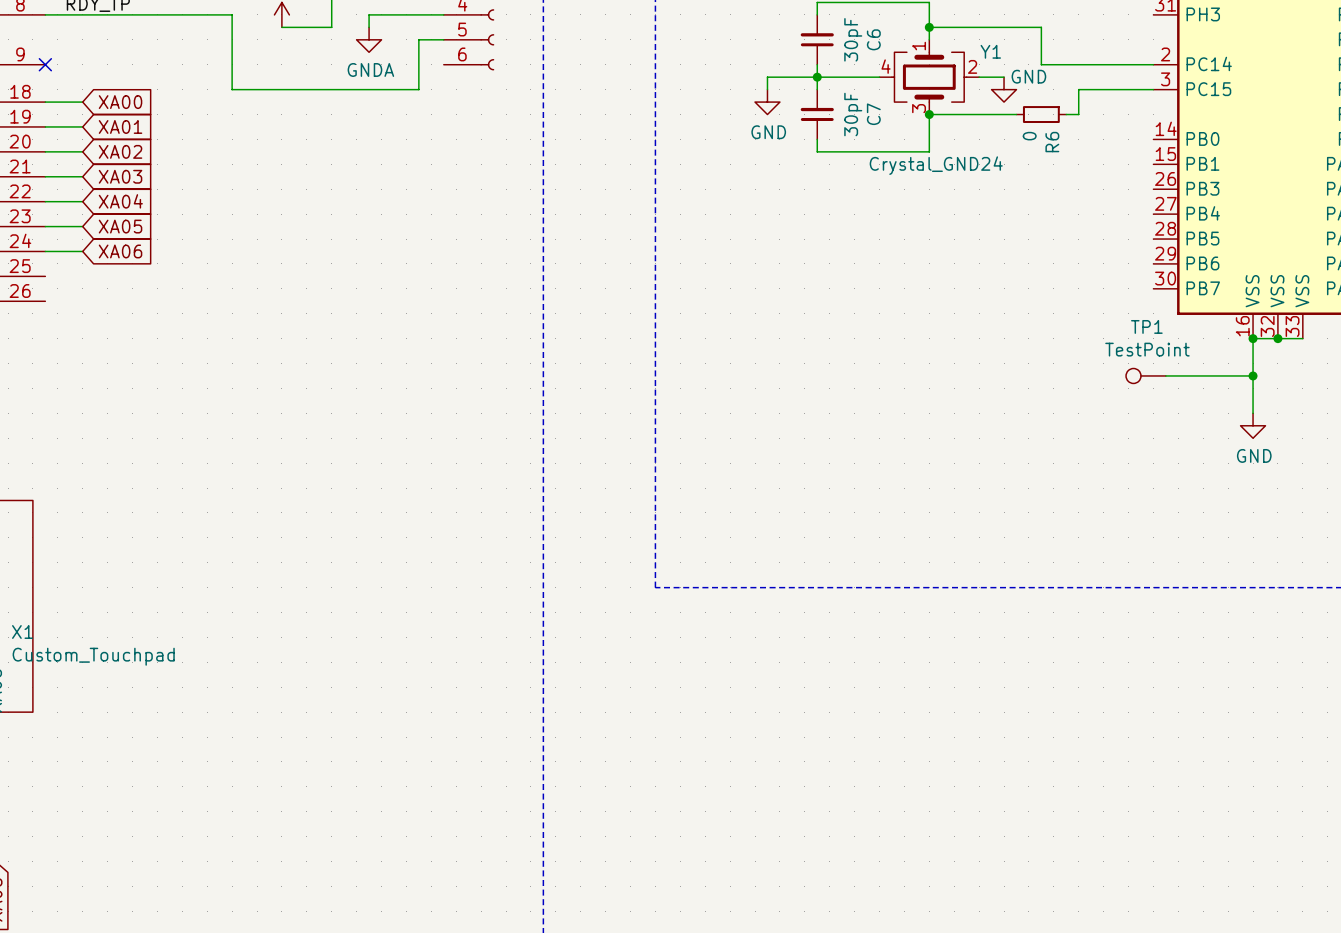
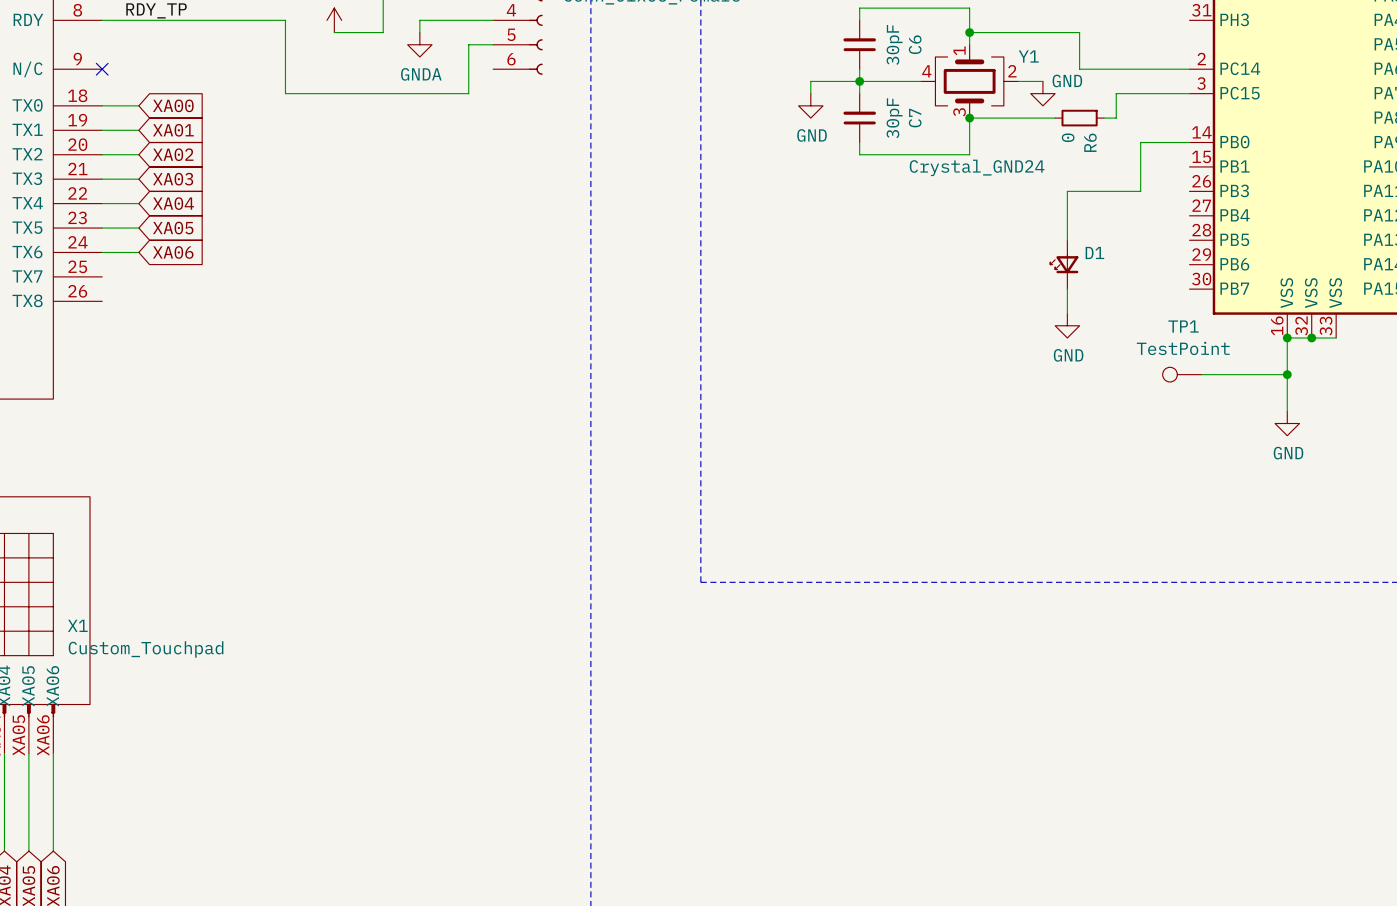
wire: none -> (1189, 142) (1140, 142) (1140, 191) (1067, 191) (1067, 240)
D1: none -> (1064, 264)
wire: none -> (1067, 289) (1067, 313)
power symbol: none -> GND (1067, 325)

